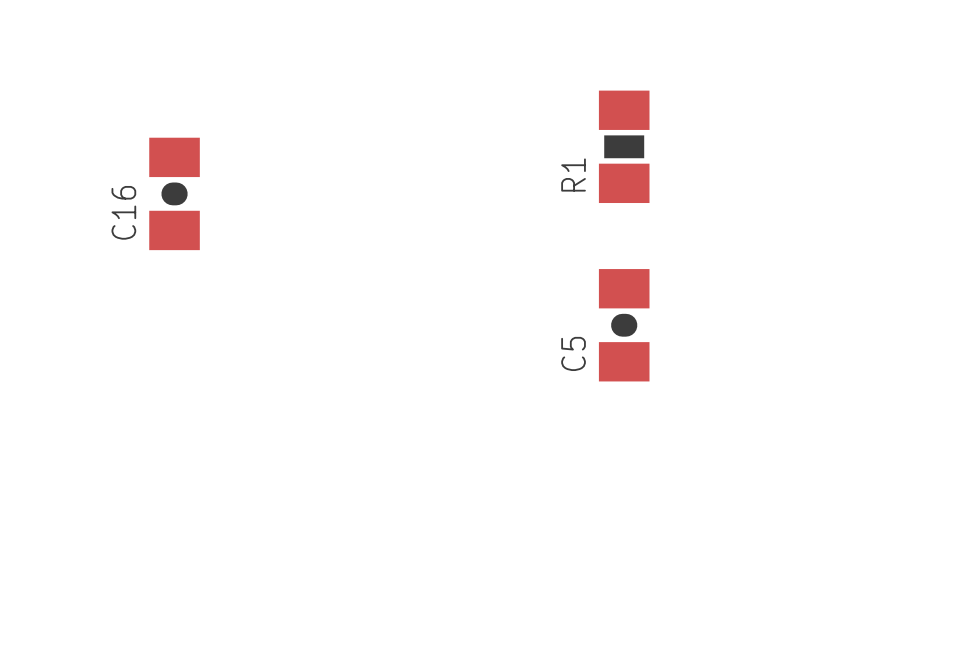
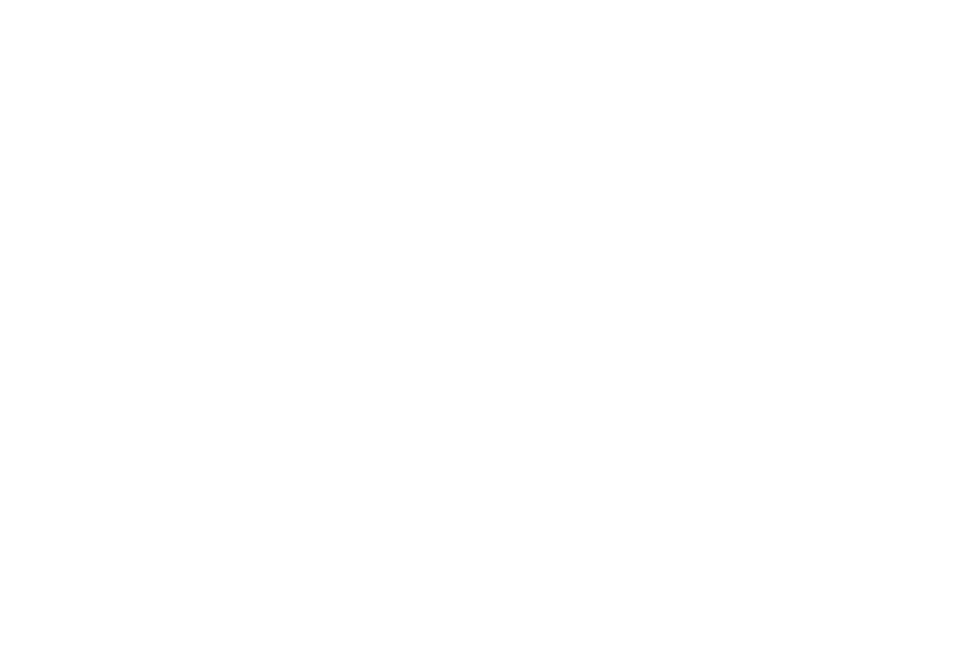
R1: (624, 146) -> none
C16: (174, 193) -> none
C5: (624, 325) -> none

